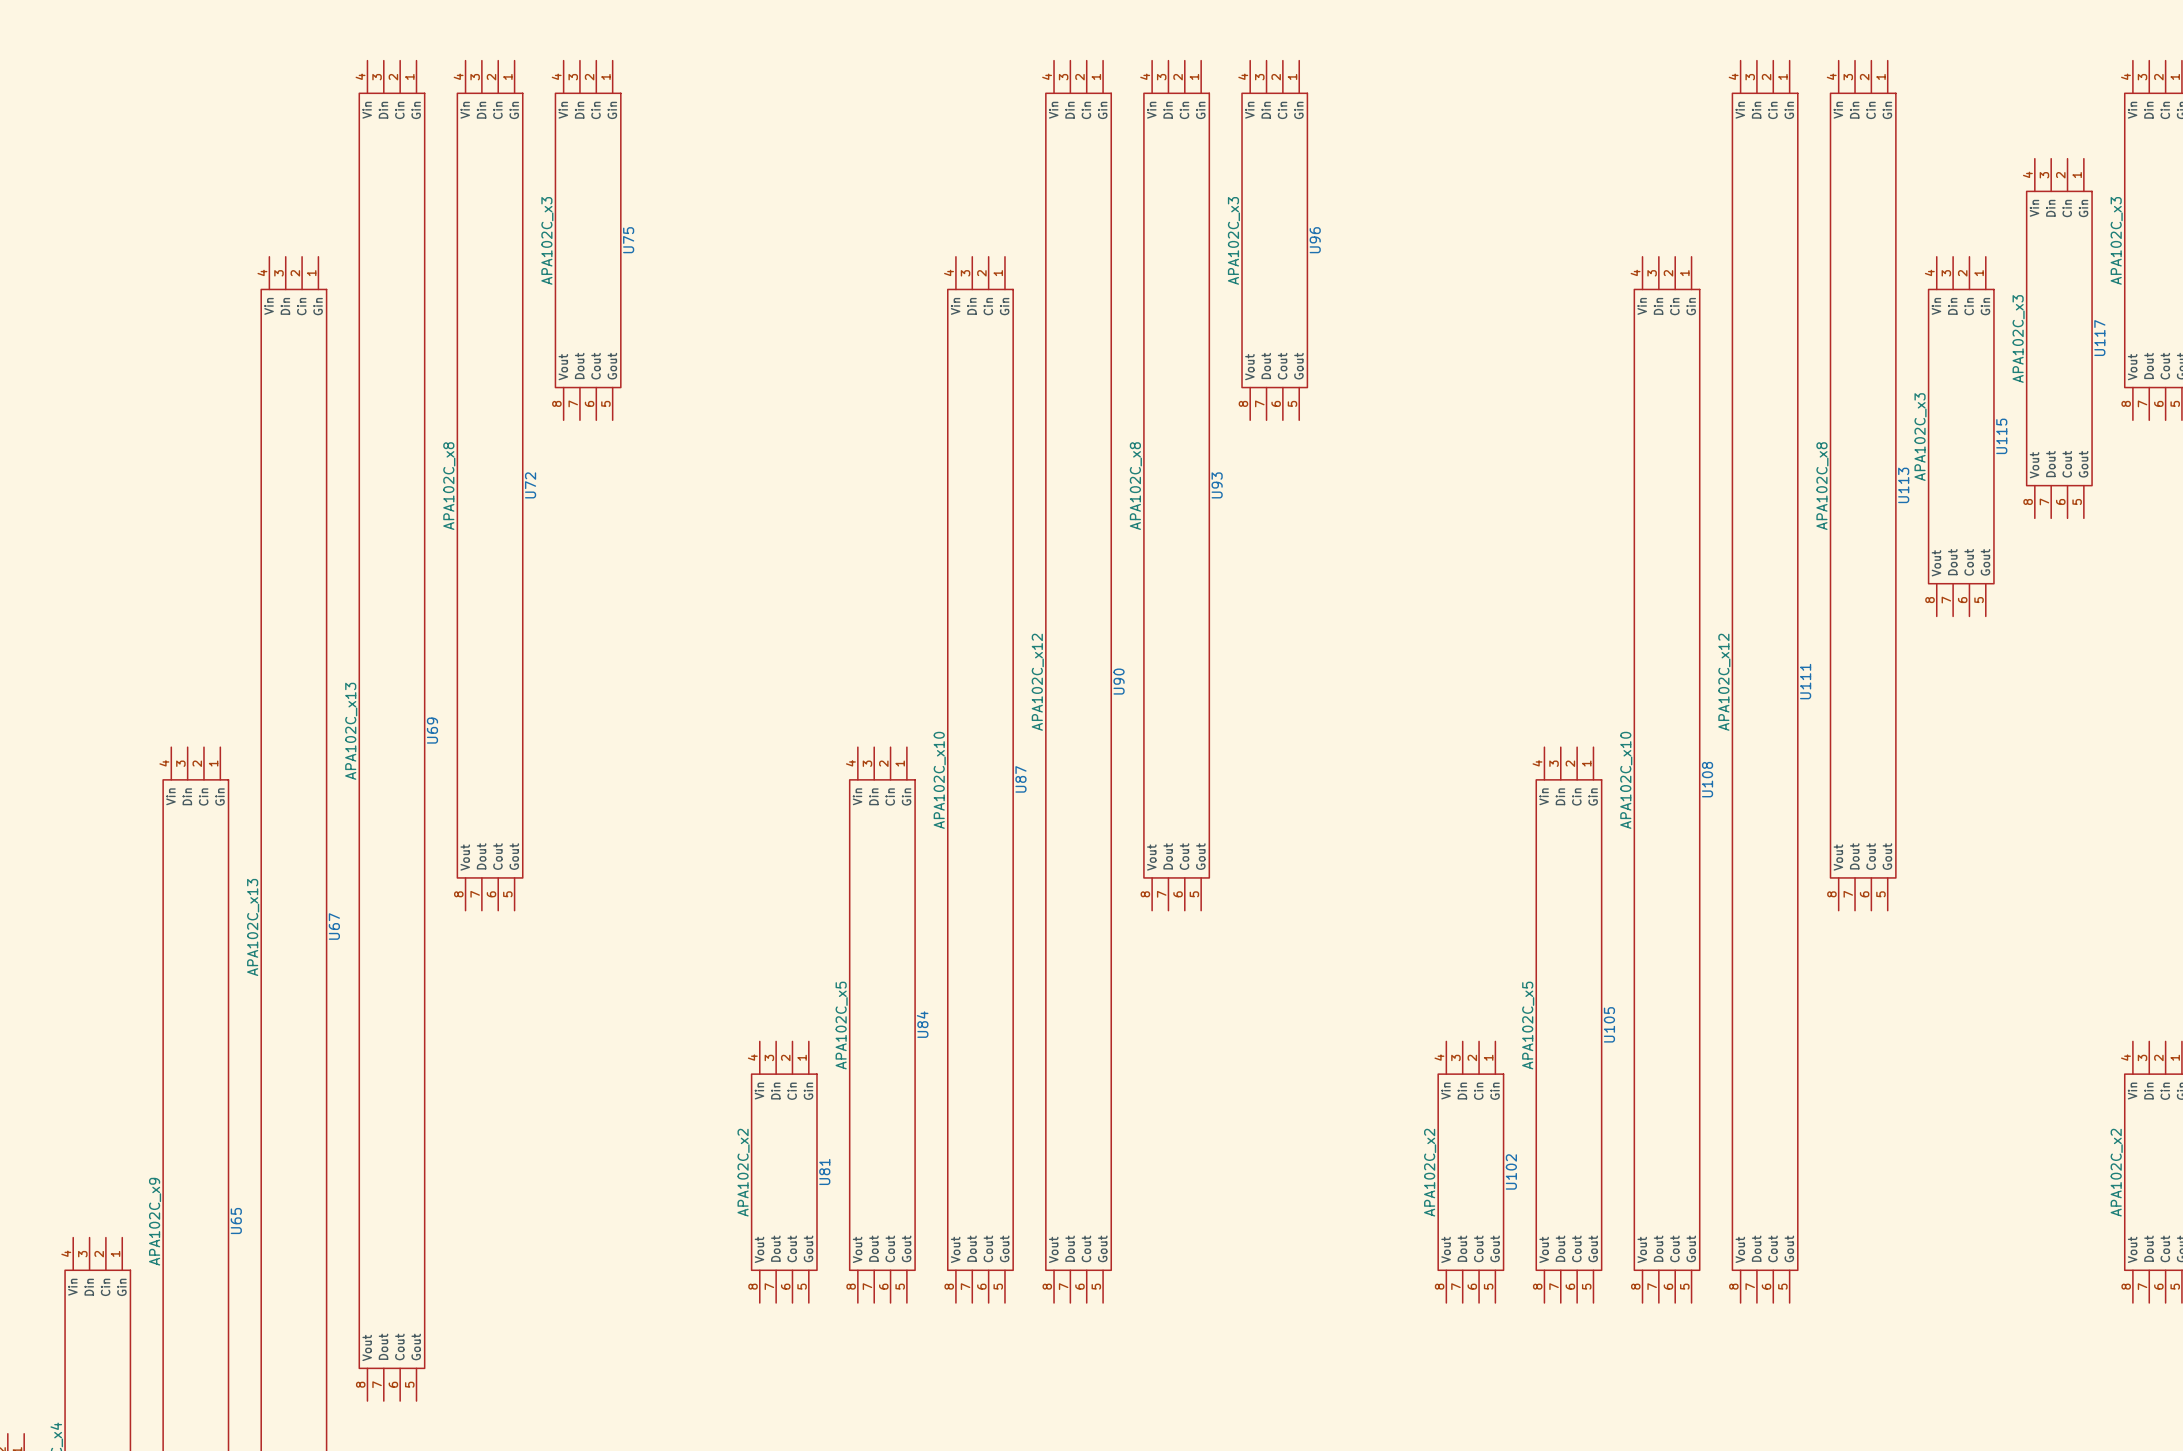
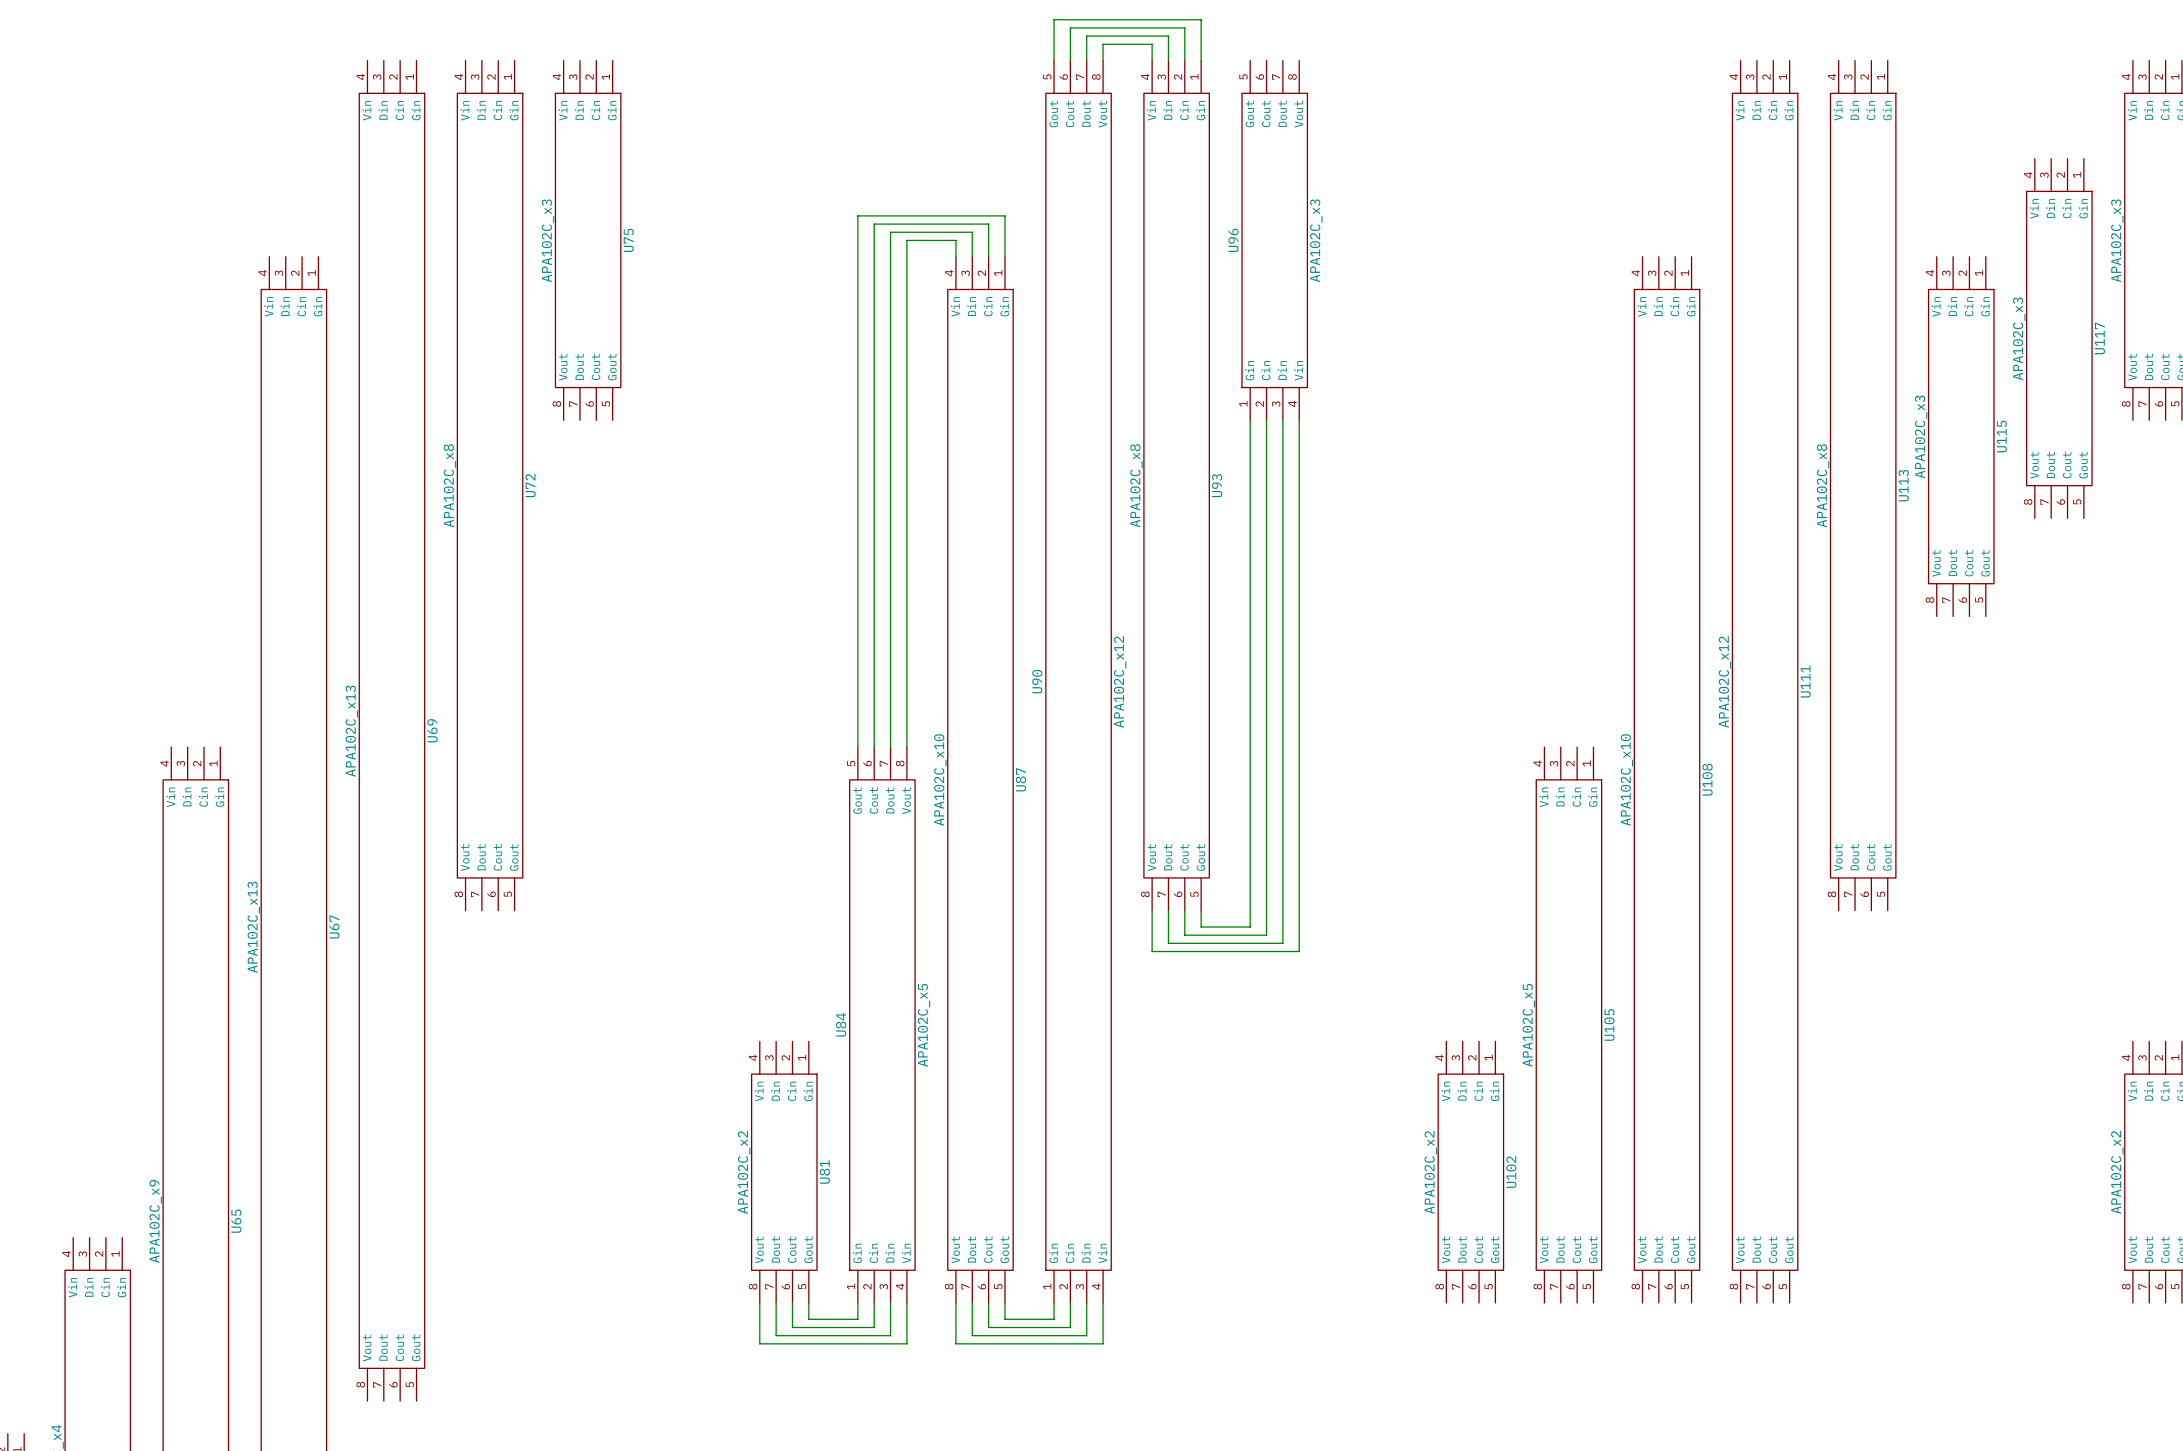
wire: none -> (1054, 60) (1054, 19) (1201, 19) (1201, 60)
wire: none -> (1070, 60) (1070, 27) (1184, 27) (1184, 60)
wire: none -> (1086, 60) (1086, 36) (1168, 36) (1168, 60)
wire: none -> (1103, 60) (1103, 44) (1152, 44) (1152, 60)
U96 rotation: 0° (1274, 240) -> 180° (1274, 240)
wire: none -> (955, 256) (955, 240) (906, 240) (906, 747)
wire: none -> (972, 256) (972, 232) (890, 232) (890, 747)
wire: none -> (988, 256) (988, 224) (874, 224) (874, 747)
wire: none -> (1004, 256) (1004, 215) (857, 215) (857, 747)
wire: none -> (1250, 420) (1250, 927) (1201, 927) (1201, 910)
wire: none -> (1266, 420) (1266, 935) (1184, 935) (1184, 910)
wire: none -> (1282, 420) (1282, 943) (1168, 943) (1168, 910)
wire: none -> (1299, 420) (1299, 951) (1152, 951) (1152, 910)
U90 rotation: 0° (1078, 681) -> 180° (1078, 681)
U84 rotation: 0° (882, 1025) -> 180° (882, 1025)
wire: none -> (759, 1302) (759, 1343) (906, 1343) (906, 1302)
wire: none -> (776, 1302) (776, 1335) (890, 1335) (890, 1302)
wire: none -> (792, 1302) (792, 1327) (874, 1327) (874, 1302)
wire: none -> (808, 1302) (808, 1319) (857, 1319) (857, 1302)
wire: none -> (955, 1302) (955, 1343) (1103, 1343) (1103, 1302)
wire: none -> (972, 1302) (972, 1335) (1086, 1335) (1086, 1302)
wire: none -> (988, 1302) (988, 1327) (1070, 1327) (1070, 1302)
wire: none -> (1004, 1302) (1004, 1319) (1054, 1319) (1054, 1302)

